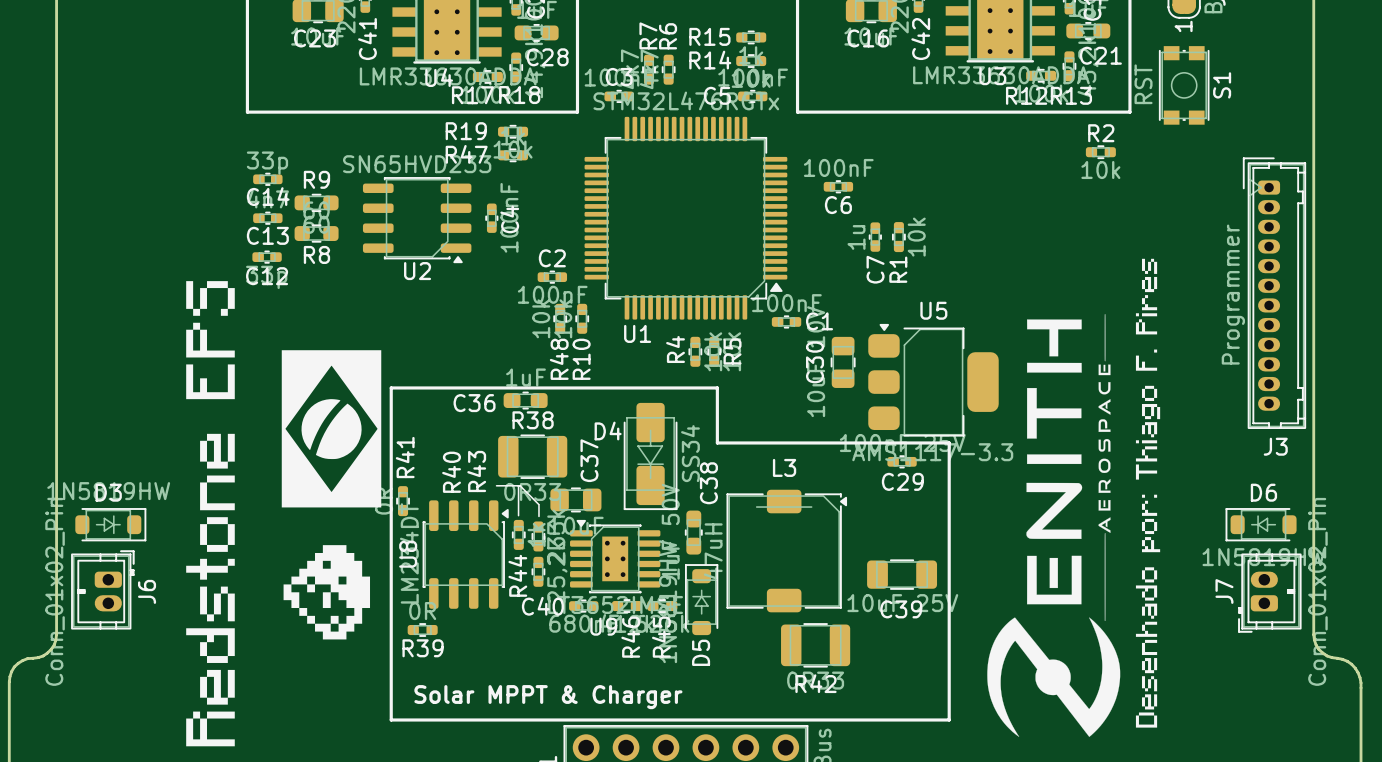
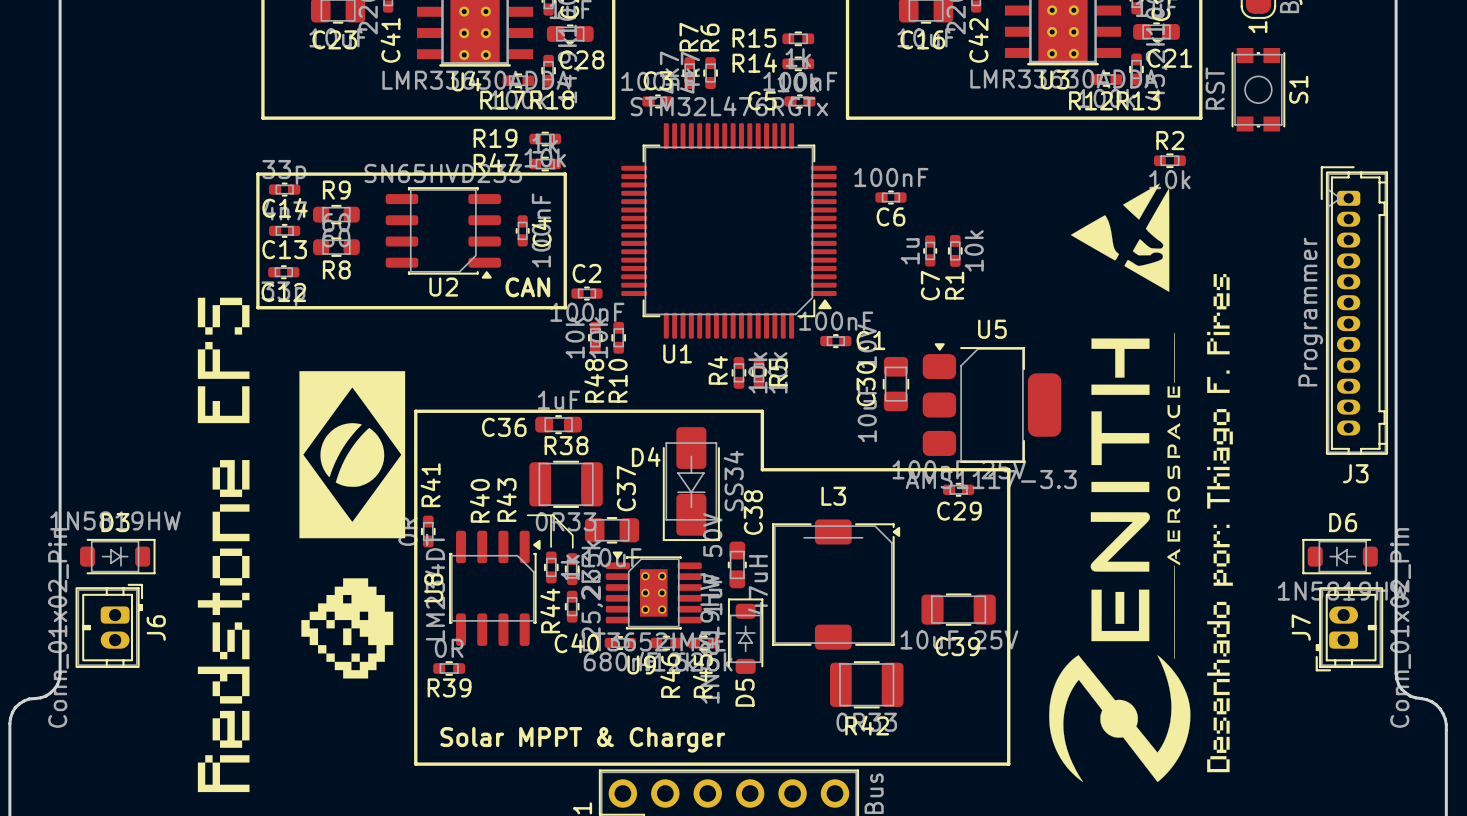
line: none -> (257, 174) (565, 174) (565, 307) (257, 307) (257, 174)
drawing: none -> [1070, 183, 1170, 292]
text: none -> CAN (527, 287)

